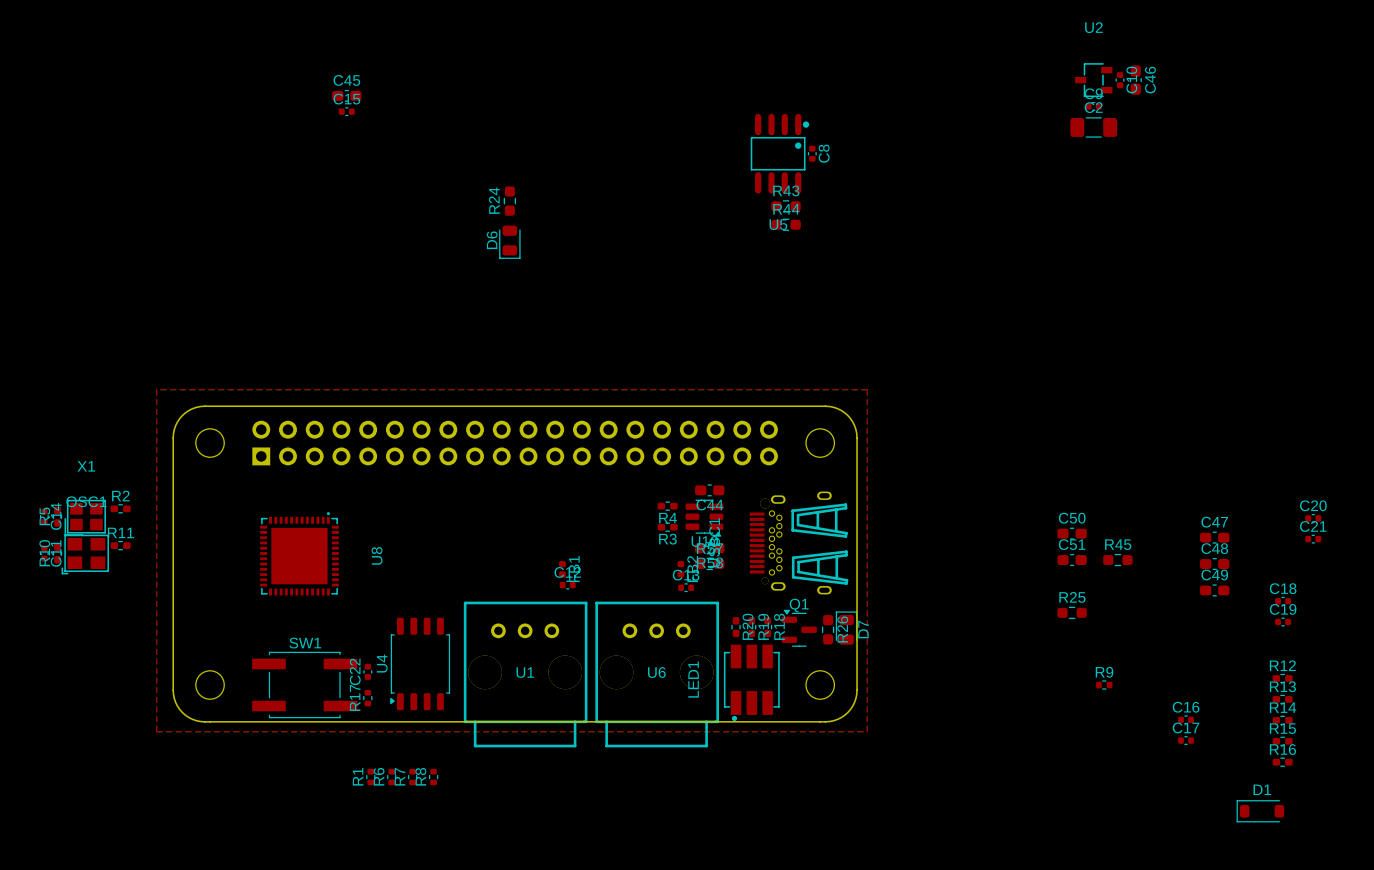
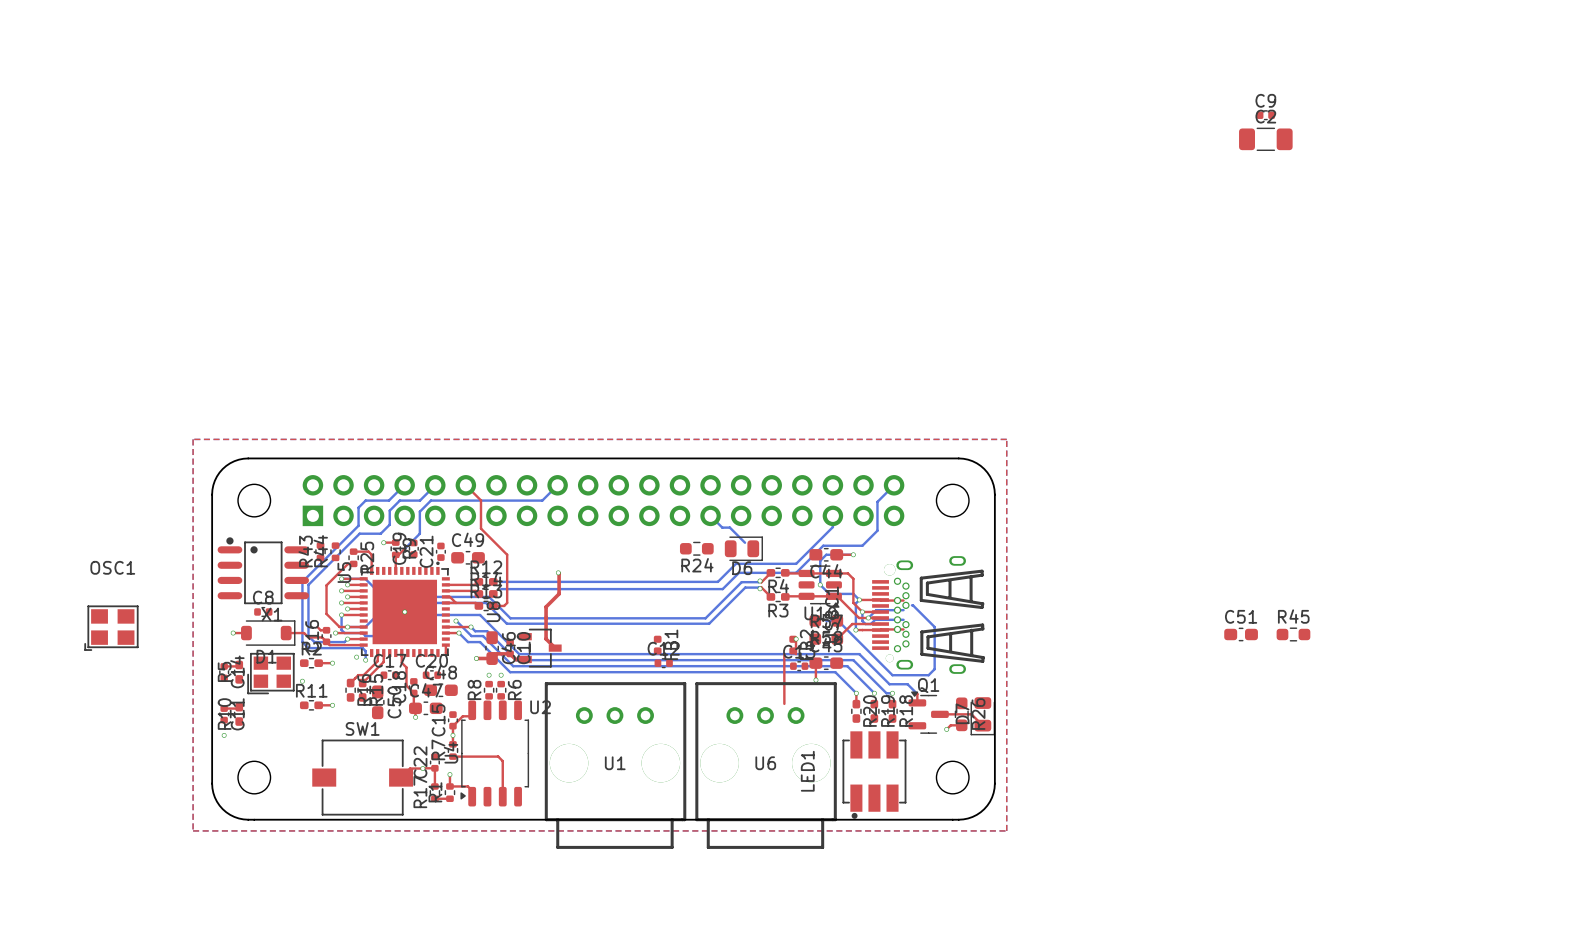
U2 rotation: 0° (1093, 80) -> 180° (540, 648)
U2 position: (1093, 80) -> (540, 648)
C10 position: (1120, 80) -> (510, 648)
C46 position: (1135, 80) -> (492, 648)
C45 position: (346, 95) -> (826, 663)
C15 rotation: 0° (346, 111) -> 90° clockwise (452, 720)
C15 position: (346, 111) -> (452, 720)
U5 rotation: 0° (779, 153) -> 90° counterclockwise (263, 570)
U5 position: (779, 153) -> (263, 570)
C8 rotation: 0° (812, 153) -> 90° clockwise (263, 611)
C8 position: (812, 153) -> (263, 611)
R24 name position: R24 (494, 200) -> R24 (697, 565)
R43 footprint: [771, 200, 801, 213] -> [315, 542, 326, 562]
R24 rotation: 0° (509, 201) -> 90° clockwise (696, 548)
R24 position: (509, 201) -> (696, 548)
R44 footprint: [771, 218, 801, 231] -> [330, 542, 341, 562]
D6 rotation: 0° (509, 242) -> 90° counterclockwise (743, 548)
D6 position: (509, 242) -> (743, 548)
bottom track: none -> (404, 485) (388, 500) (365, 500) (358, 507) (358, 525) (302, 581) (302, 642) (308, 648) (362, 648) (365, 651) (365, 660)
bottom track: none -> (435, 485) (419, 500) (399, 500) (389, 510) (389, 524) (380, 533) (359, 533) (308, 584) (308, 636) (314, 642) (344, 642) (347, 639)
top track: none -> (465, 485) (480, 500) (480, 528) (507, 554) (507, 602) (504, 605) (493, 605)
bottom track: none -> (557, 485) (542, 500) (430, 500) (419, 511) (419, 533) (404, 548)
bottom track: none -> (894, 485) (877, 501) (877, 530) (862, 545) (823, 545) (796, 572) (738, 572) (722, 589) (501, 589)
bottom track: none -> (710, 515) (722, 527) (729, 527) (745, 542)
bottom track: none -> (832, 515) (832, 527) (796, 563) (735, 563) (717, 581) (501, 581)
top track: none -> (383, 542) (395, 542)
via: none -> (383, 542)
top track: none -> (404, 548) (398, 554) (395, 554) (395, 570)
top track: none -> (353, 551) (368, 551) (371, 554) (371, 570)
top track: none -> (836, 554) (853, 554)
bottom track: none -> (853, 554) (826, 554) (820, 560) (820, 584) (829, 593) (853, 593) (859, 599) (855, 603) (855, 630)
via: none -> (853, 554)
top track: none -> (353, 563) (347, 563) (326, 585) (326, 613) (339, 627) (363, 627)
top track: none -> (558, 572) (559, 593) (546, 606) (546, 638) (555, 648)
via: none -> (558, 572)
top track: none -> (785, 572) (847, 573) (853, 578) (853, 602) (862, 611) (880, 611)
top track: none -> (770, 574) (761, 582) (760, 580)
R2 position: (120, 508) -> (311, 663)
top track: none -> (341, 578) (363, 578)
bottom track: none -> (341, 578) (365, 578) (383, 596) (489, 596) (510, 618) (705, 618) (741, 582) (760, 580)
via: none -> (341, 578)
via: none -> (760, 580)
top track: none -> (478, 581) (475, 584) (445, 584)
C14 position: (44, 516) -> (224, 672)
R5 position: (57, 516) -> (239, 672)
top track: none -> (347, 584) (363, 584)
via: none -> (347, 584)
via: none -> (820, 584)
X1 position: (85, 517) -> (270, 673)
C20 position: (1313, 518) -> (431, 675)
top track: none -> (760, 588) (761, 587) (770, 596)
bottom track: none -> (760, 588) (745, 587) (709, 623) (506, 623) (486, 602) (389, 602) (365, 627) (347, 627)
via: none -> (760, 588)
top track: none -> (341, 590) (363, 590)
via: none -> (341, 590)
top track: none -> (445, 590) (475, 590) (478, 593)
top track: none -> (347, 596) (363, 596)
via: none -> (347, 596)
top track: none -> (445, 596) (449, 596) (455, 602)
top track: none -> (785, 596) (837, 596) (859, 618) (880, 618)
top track: none -> (859, 599) (903, 600)
via: none -> (859, 599)
top track: none -> (341, 602) (363, 602)
via: none -> (341, 602)
top track: none -> (445, 602) (475, 602) (478, 605)
C50 rotation: 0° (1072, 533) -> 90° clockwise (377, 702)
C50 position: (1072, 533) -> (377, 702)
bottom track: none -> (911, 605) (934, 627) (934, 669) (928, 675) (892, 675) (838, 621) (826, 621)
top track: none -> (347, 608) (363, 608)
via: none -> (347, 608)
C47 position: (1214, 537) -> (425, 708)
bottom track: none -> (903, 610) (876, 610) (868, 618)
C21 rotation: 0° (1313, 539) -> 90° clockwise (440, 551)
C21 position: (1313, 539) -> (440, 551)
via: none -> (404, 611)
bottom track: none -> (862, 611) (862, 621) (865, 624) (870, 624) (875, 619) (903, 619)
via: none -> (862, 611)
top track: none -> (341, 614) (363, 614)
bottom track: none -> (341, 614) (341, 630) (344, 633) (362, 633) (365, 636) (404, 636) (425, 614) (480, 614) (519, 654) (859, 654) (889, 684) (907, 684) (916, 693)
via: none -> (341, 614)
R11 position: (120, 545) -> (311, 705)
via: none -> (868, 618)
bottom track: none -> (455, 621) (471, 636) (483, 636) (513, 666) (847, 666) (874, 693)
via: none -> (455, 621)
top track: none -> (880, 624) (852, 624) (837, 639)
C11 position: (44, 553) -> (224, 714)
R10 position: (57, 553) -> (239, 714)
top track: none -> (317, 627) (320, 630) (326, 630)
via: none -> (347, 627)
U8 position: (299, 553) -> (404, 609)
top track: none -> (445, 627) (471, 627)
bottom track: none -> (471, 627) (475, 631) (487, 631) (516, 660) (853, 660) (886, 693) (892, 693)
via: none -> (471, 627)
top track: none -> (903, 629) (855, 630)
via: none -> (855, 630)
top track: none -> (233, 633) (246, 633)
via: none -> (233, 633)
top track: none -> (286, 633) (304, 633) (308, 637) (322, 637) (329, 645) (363, 645)
top track: none -> (335, 633) (363, 633)
via: none -> (335, 633)
top track: none -> (445, 633) (458, 633)
bottom track: none -> (458, 633) (468, 642) (480, 642) (510, 672) (835, 672) (856, 693)
via: none -> (458, 633)
top track: none -> (347, 639) (363, 639)
via: none -> (347, 639)
top track: none -> (796, 639) (796, 654)
via: none -> (796, 639)
C48 position: (1214, 564) -> (440, 690)
top track: none -> (445, 645) (446, 654)
top track: none -> (377, 653) (377, 661) (363, 675) (358, 675) (350, 682)
top track: none -> (383, 653) (383, 661) (362, 683)
top track: none -> (401, 653) (401, 662) (406, 667) (406, 685) (413, 693) (415, 717)
top track: none -> (784, 654) (784, 703)
via: none -> (356, 657)
top track: none -> (476, 658) (492, 658) (496, 653) (510, 653) (515, 659) (525, 659)
via: none -> (476, 658)
via: none -> (365, 660)
top track: none -> (318, 663) (332, 663)
via: none -> (332, 663)
top track: none -> (239, 664) (224, 666)
top track: none -> (815, 666) (815, 680)
C49 position: (1214, 590) -> (468, 557)
via: none -> (489, 675)
via: none -> (501, 675)
via: none -> (815, 680)
via: none -> (302, 681)
C18 rotation: 0° (1283, 601) -> 90° clockwise (413, 687)
C18 position: (1283, 601) -> (413, 687)
R25 footprint: [1057, 606, 1087, 619] -> [348, 548, 359, 568]
top track: none -> (856, 693) (856, 704)
via: none -> (856, 693)
via: none -> (874, 693)
via: none -> (892, 693)
top track: none -> (916, 693) (917, 702)
top track: none -> (318, 705) (332, 705)
via: none -> (332, 705)
C19 rotation: 0° (1283, 622) -> 90° clockwise (413, 548)
C19 position: (1283, 622) -> (413, 548)
top track: none -> (239, 707) (224, 708)
D7 rotation: 0° (846, 628) -> 180° (982, 716)
top track: none -> (939, 714) (971, 714) (982, 725)
top track: none -> (472, 716) (462, 716) (452, 726) (452, 744)
via: none -> (415, 717)
top track: none -> (961, 725) (950, 725) (946, 729)
via: none -> (946, 729)
via: none -> (224, 735)
via: none -> (452, 735)
SW1 footprint: [252, 651, 358, 719] -> [312, 739, 414, 816]
top track: none -> (452, 756) (498, 756)
top track: none -> (498, 756) (502, 761) (502, 802)
via: none -> (422, 768)
R12 position: (1282, 678) -> (486, 581)
top track: none -> (449, 774) (449, 786) (467, 786) (472, 790) (472, 802)
via: none -> (449, 774)
top track: none -> (401, 777) (410, 768) (434, 768) (434, 786)
R9 rotation: 0° (1104, 685) -> 90° clockwise (395, 548)
R9 position: (1104, 685) -> (395, 548)
R13 position: (1282, 699) -> (486, 605)
top track: none -> (434, 798) (449, 798)
C16 rotation: 0° (1186, 719) -> 90° clockwise (326, 636)
C16 position: (1186, 719) -> (326, 636)
R14 position: (1282, 720) -> (486, 593)
C17 position: (1186, 740) -> (389, 675)
R15 rotation: 0° (1282, 741) -> 90° clockwise (362, 690)
R15 position: (1282, 741) -> (362, 690)
R16 rotation: 0° (1282, 762) -> 90° clockwise (350, 690)
R16 position: (1282, 762) -> (350, 690)
R6 name position: R6 (379, 776) -> R6 (514, 689)
R1 position: (370, 777) -> (449, 792)
R6 position: (391, 777) -> (501, 690)
R7 position: (412, 777) -> (452, 750)
R8 position: (433, 777) -> (489, 690)
D1 rotation: 0° (1260, 811) -> 180° (268, 633)
D1 position: (1260, 811) -> (268, 633)

